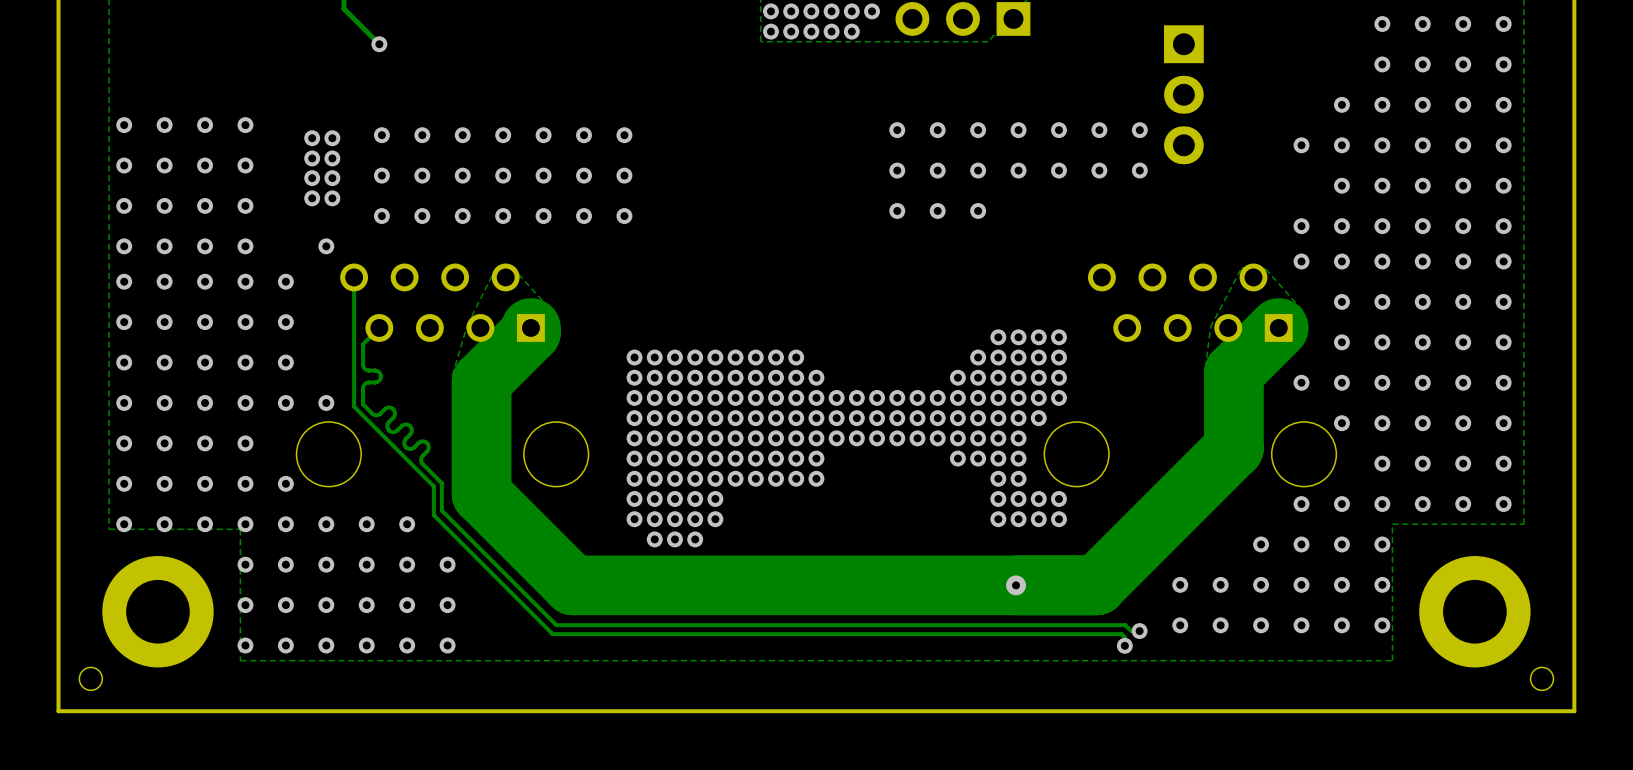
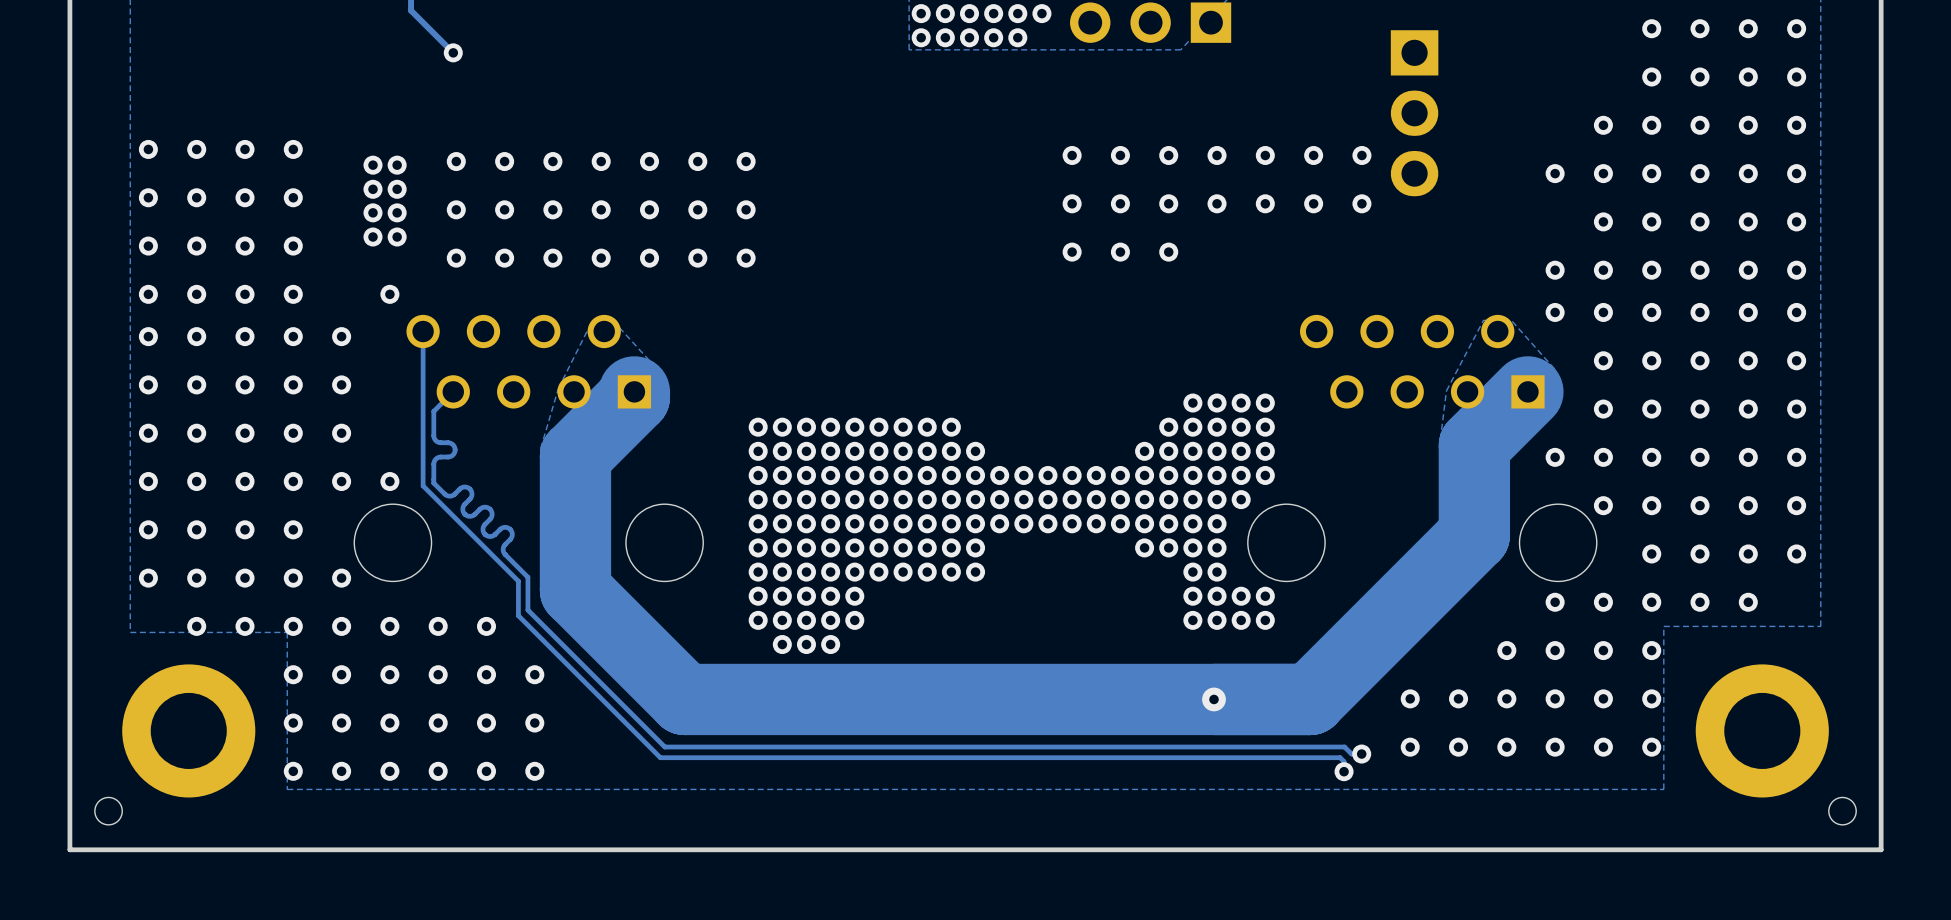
via: (1503, 504) -> none
via: (124, 524) -> none

